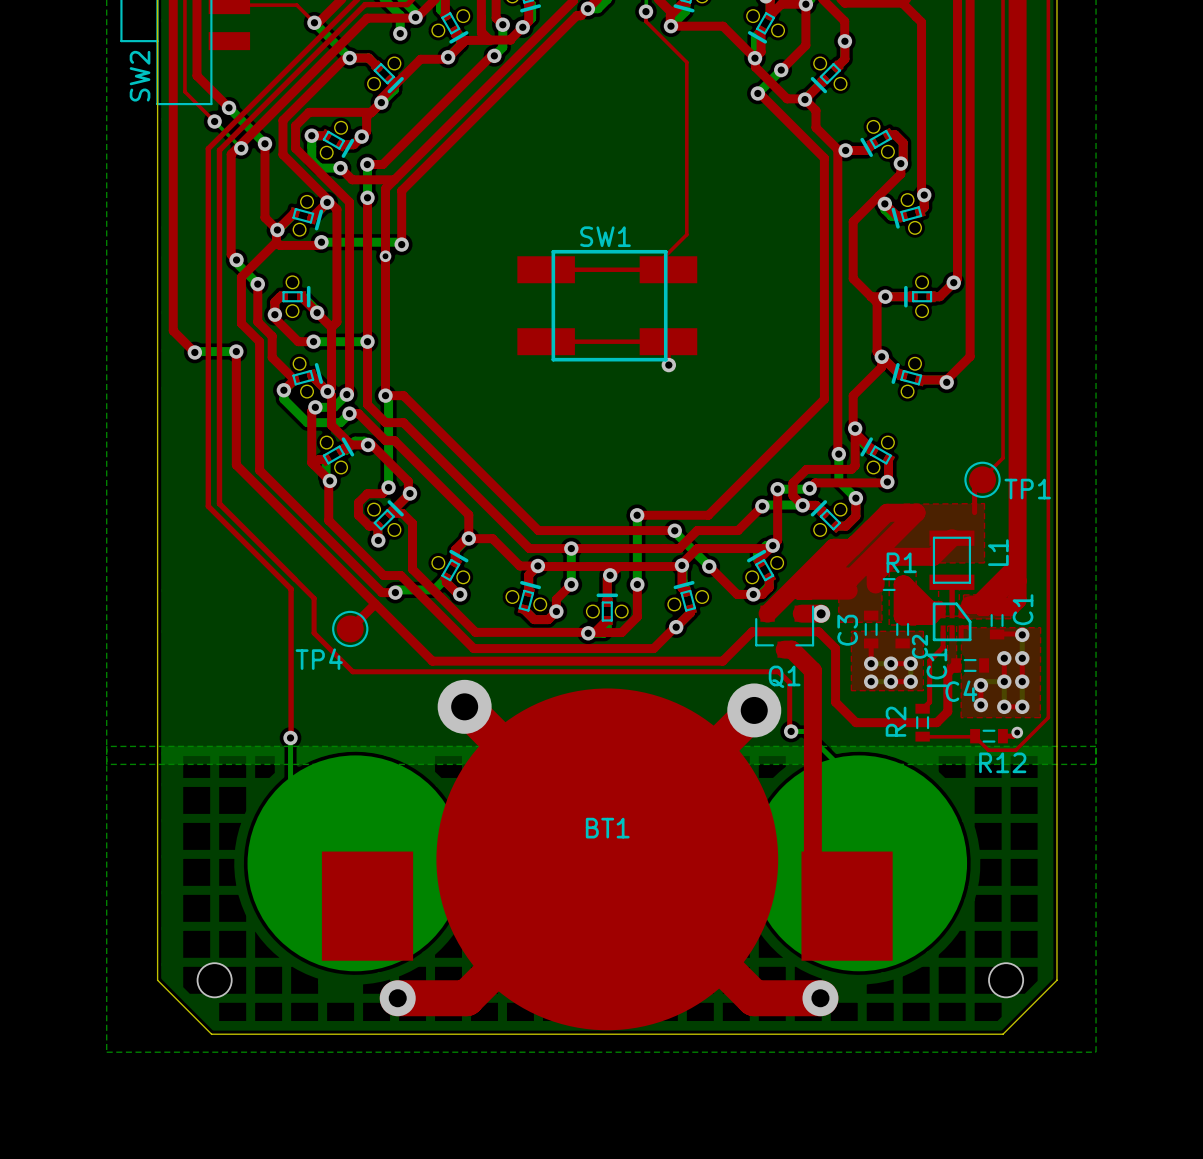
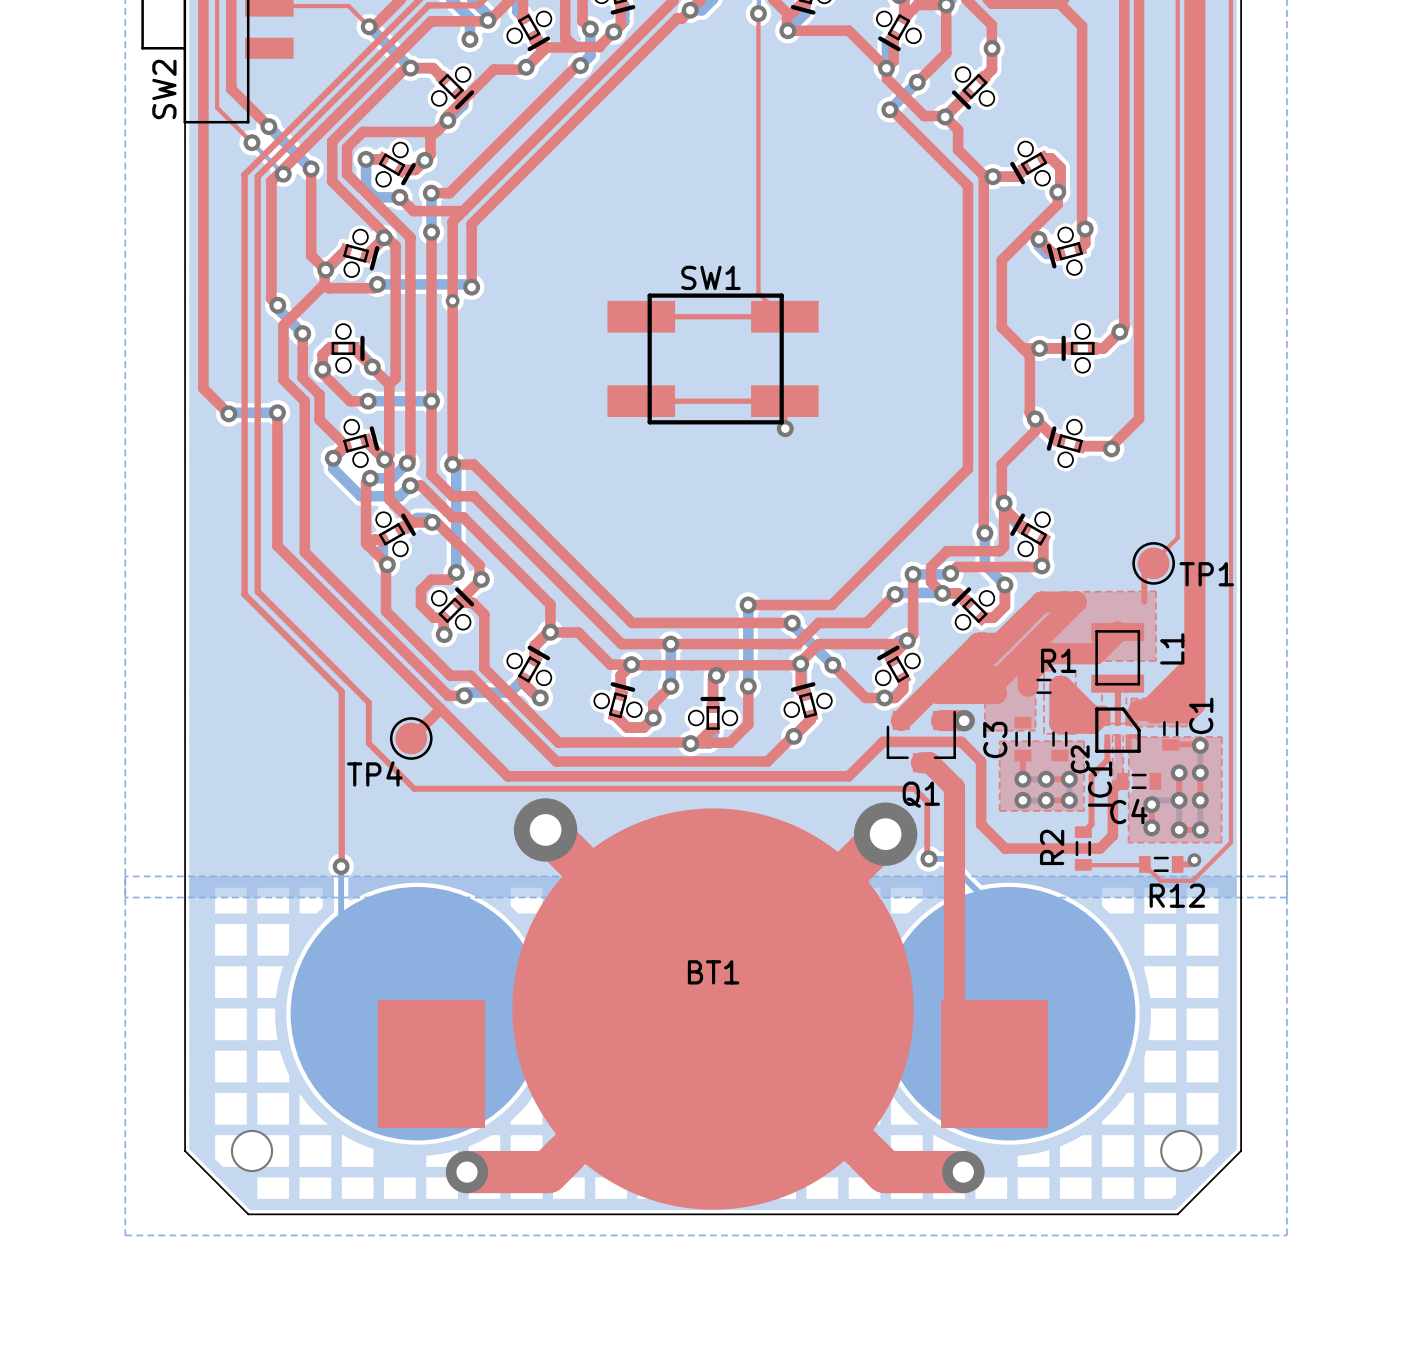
top track: (645, 21) (686, 62) (686, 234) (658, 262) -> (758, 25) (758, 293) (773, 308)

